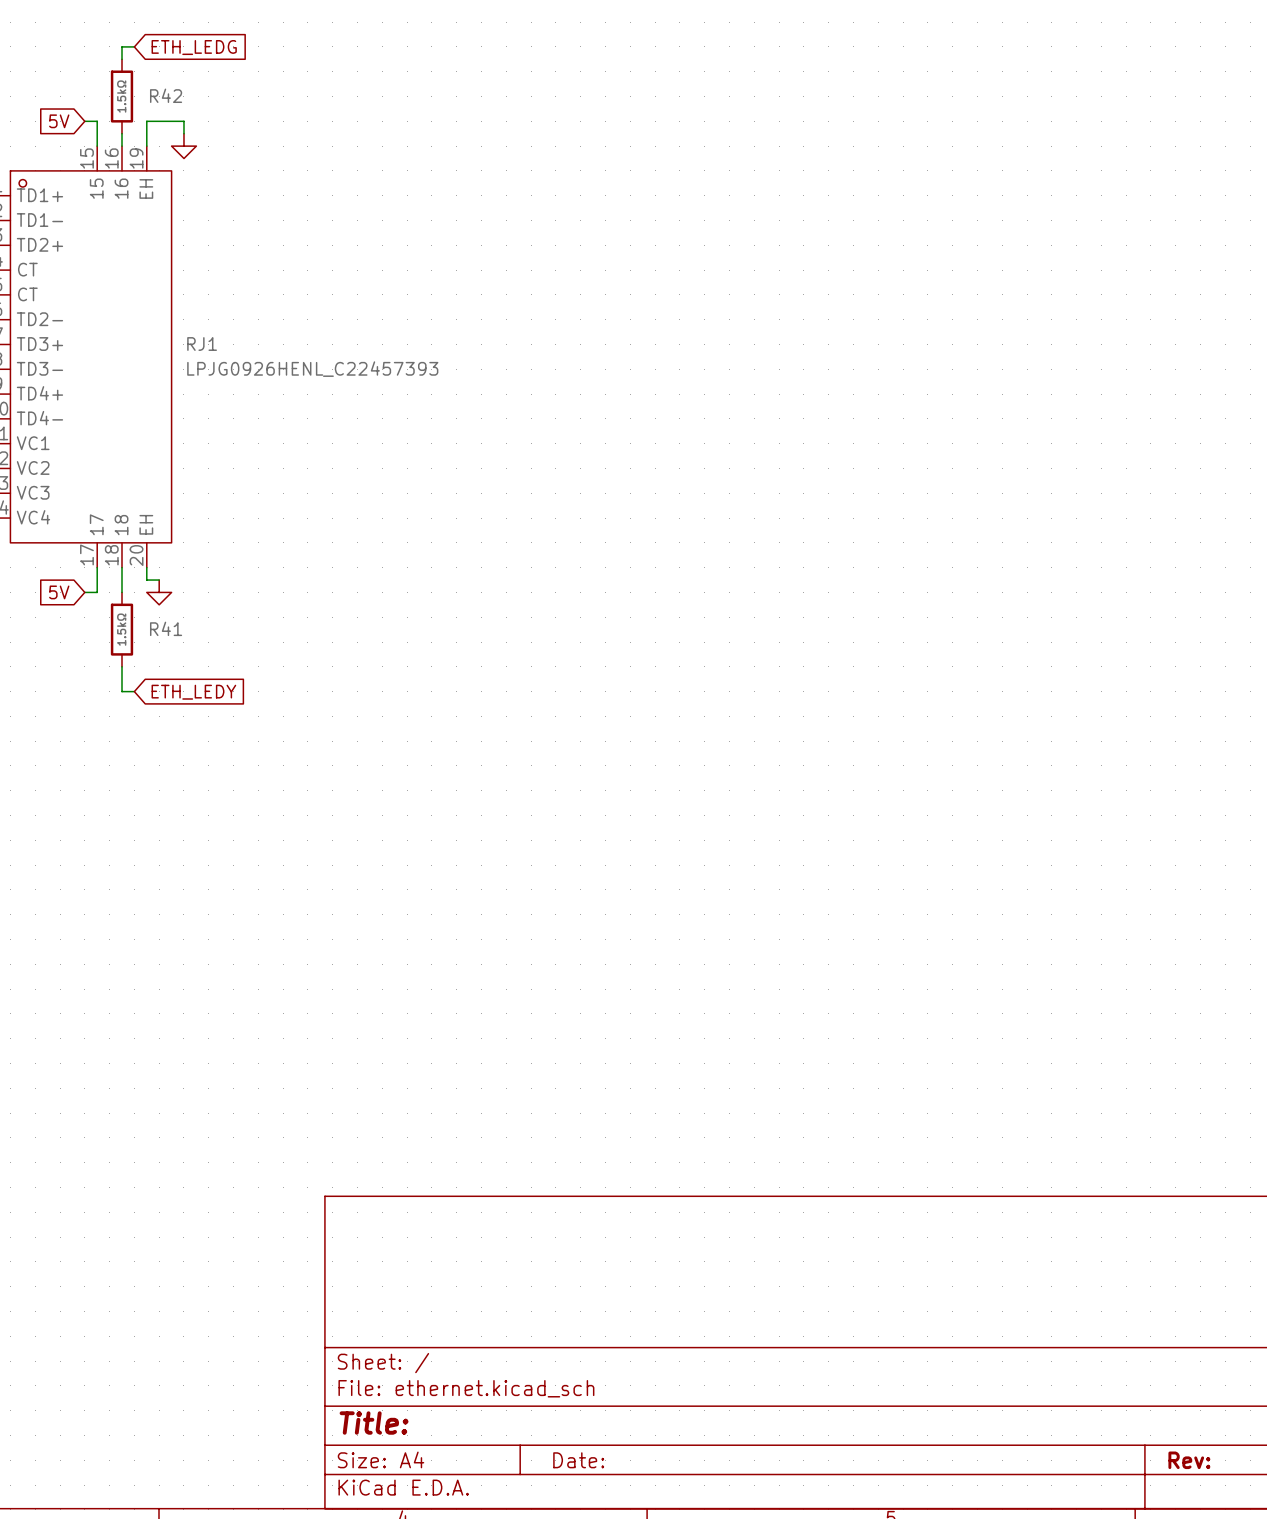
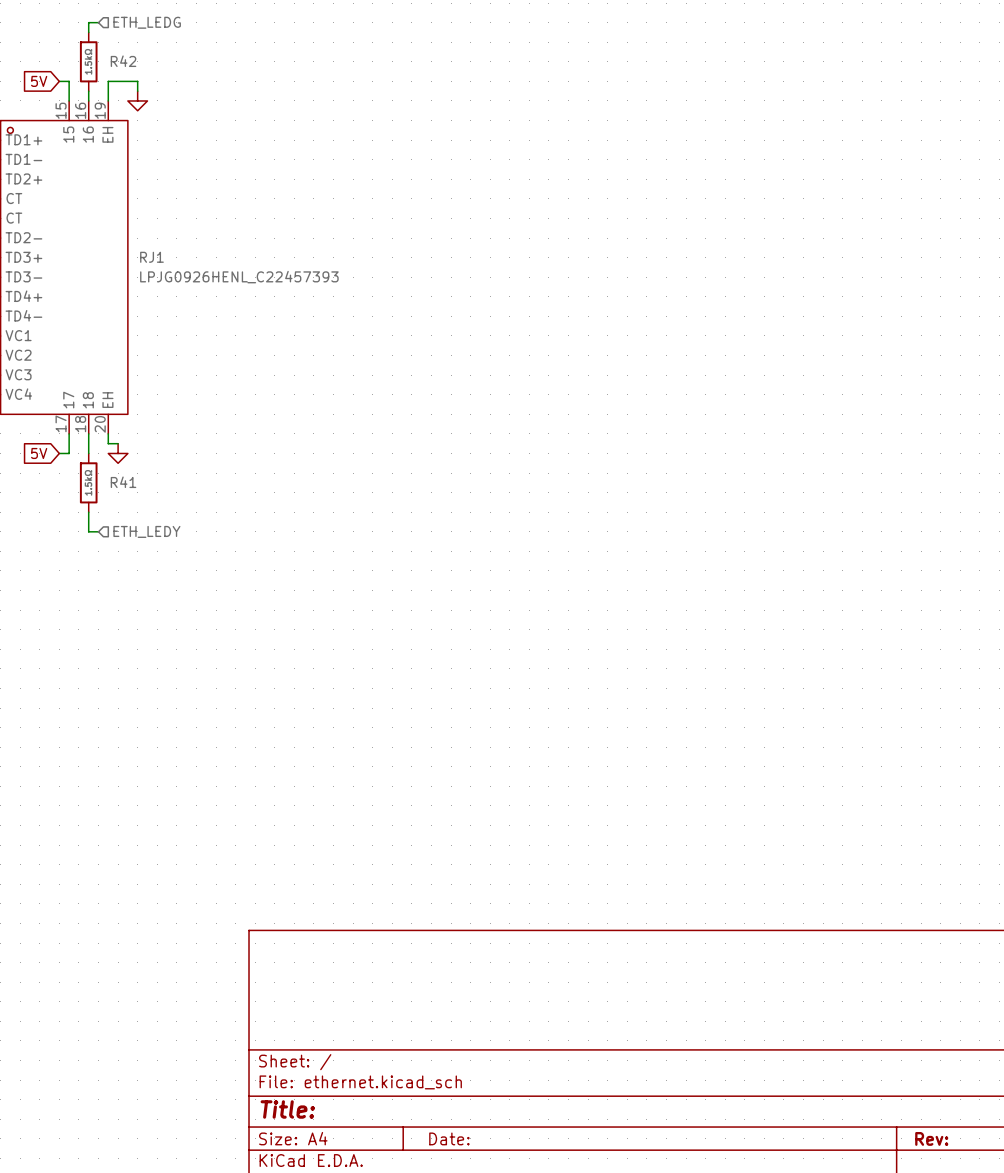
global label: ETH_LEDG (194, 47) -> none
hierarchical label: none -> ETH_LEDG (147, 22)
hierarchical label: none -> ETH_LEDY (146, 531)
global label: ETH_LEDY (193, 692) -> none

